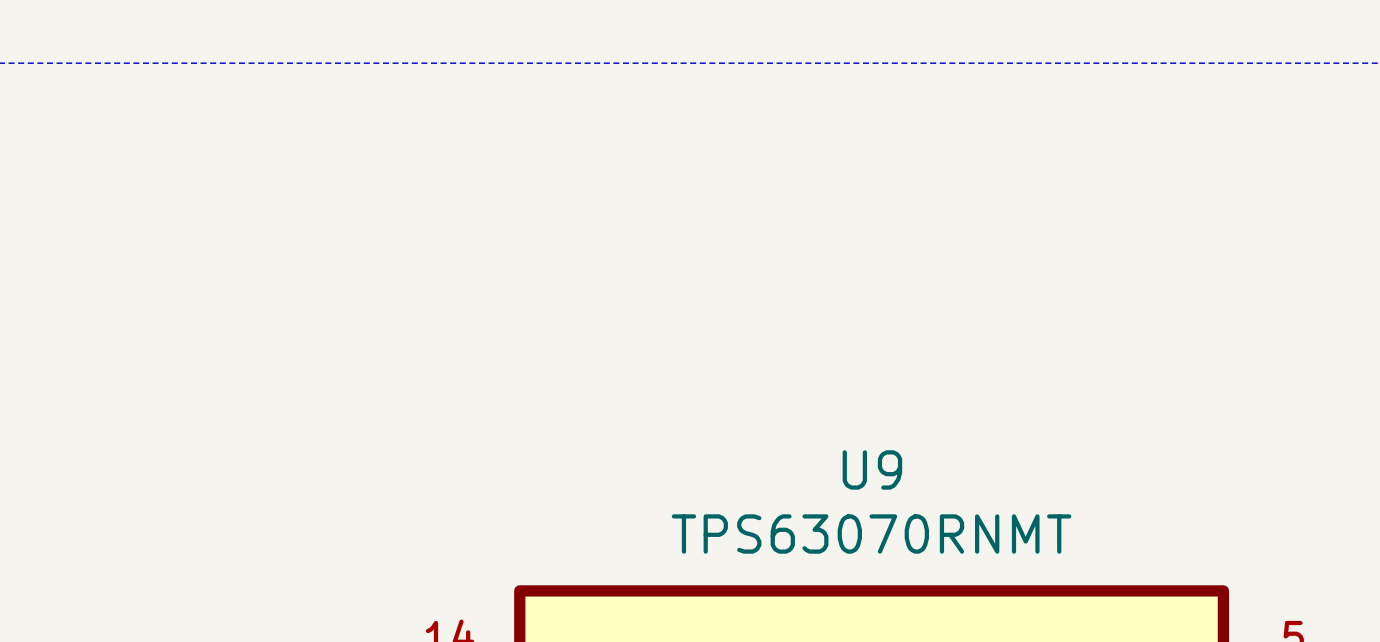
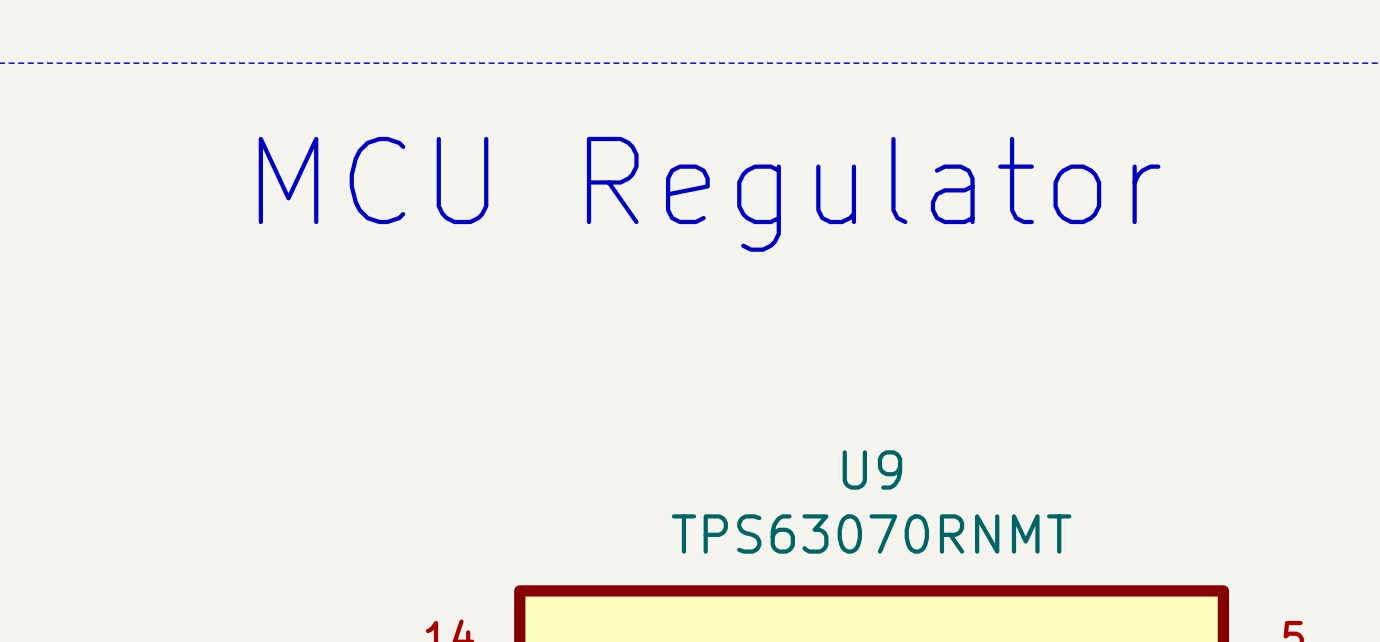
text: none -> MCU Regulator (709, 194)

